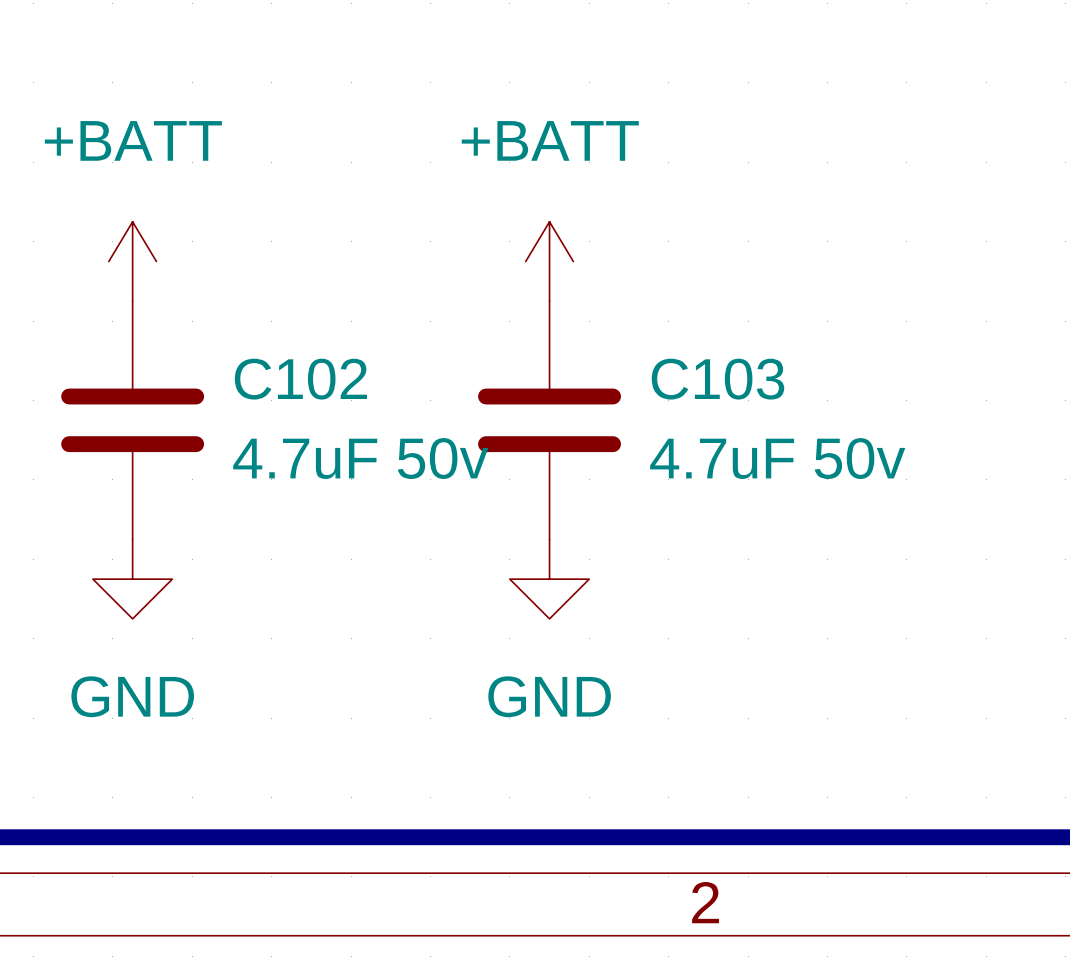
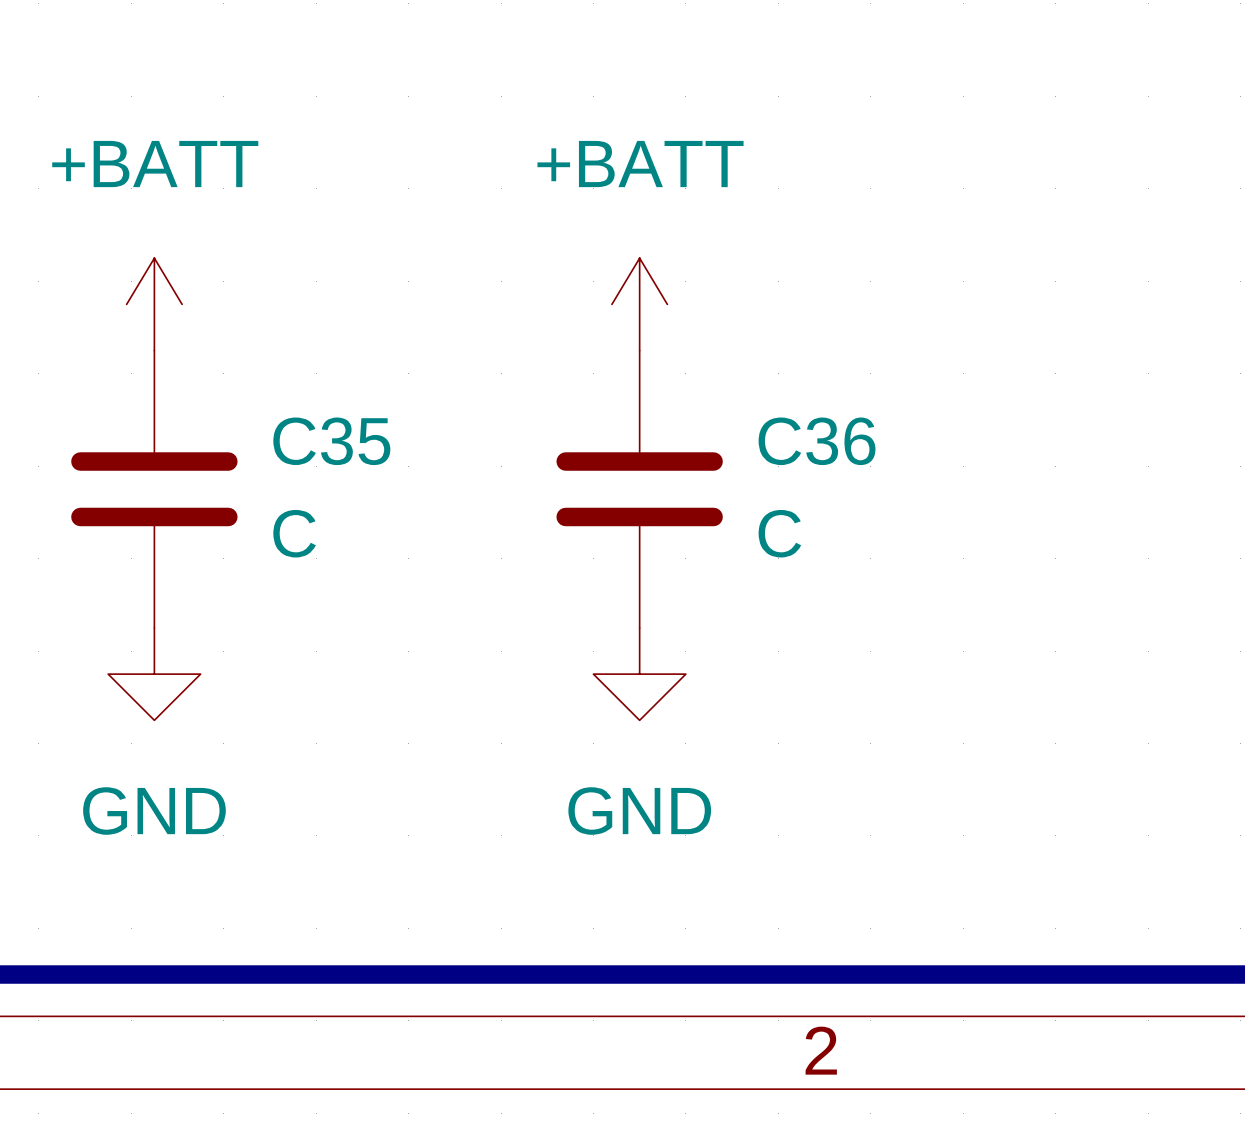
C102 name: C102 (300, 379) -> C35 (331, 441)
C103 name: C103 (717, 379) -> C36 (817, 441)
C102 value: 4.7uF 50v (360, 458) -> C (294, 533)
C103 value: 4.7uF 50v (777, 458) -> C (779, 533)

